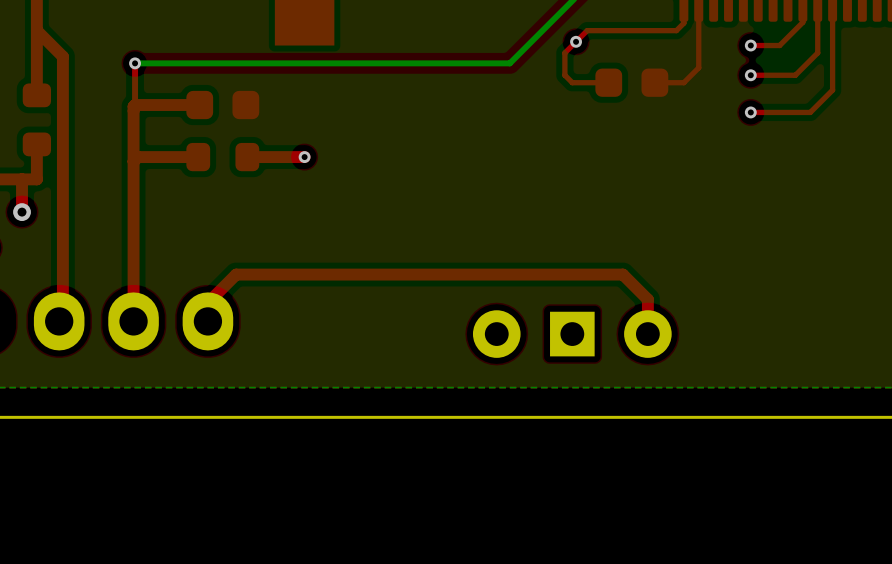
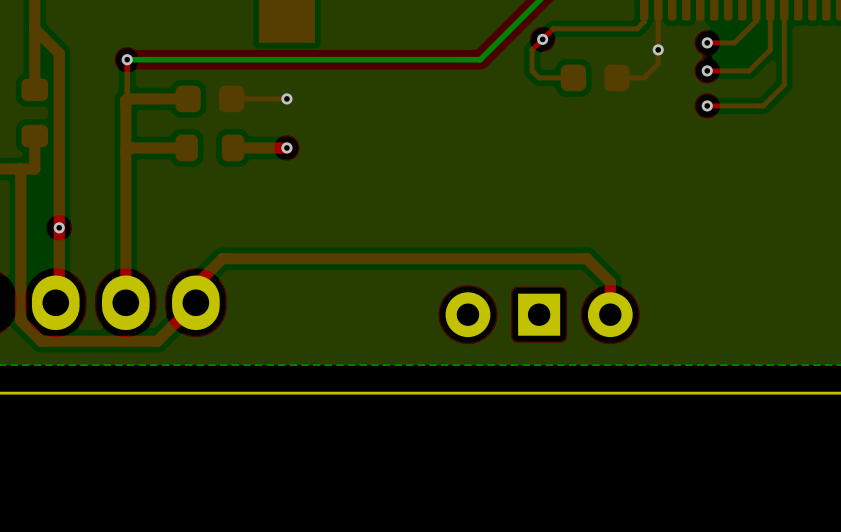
via: none -> (658, 49)
top track: none -> (286, 98) (231, 98)
via: none -> (286, 98)
top track: none -> (20, 199) (20, 320) (41, 341) (157, 341) (195, 302)
via: (22, 212) -> none
via: none -> (59, 227)

